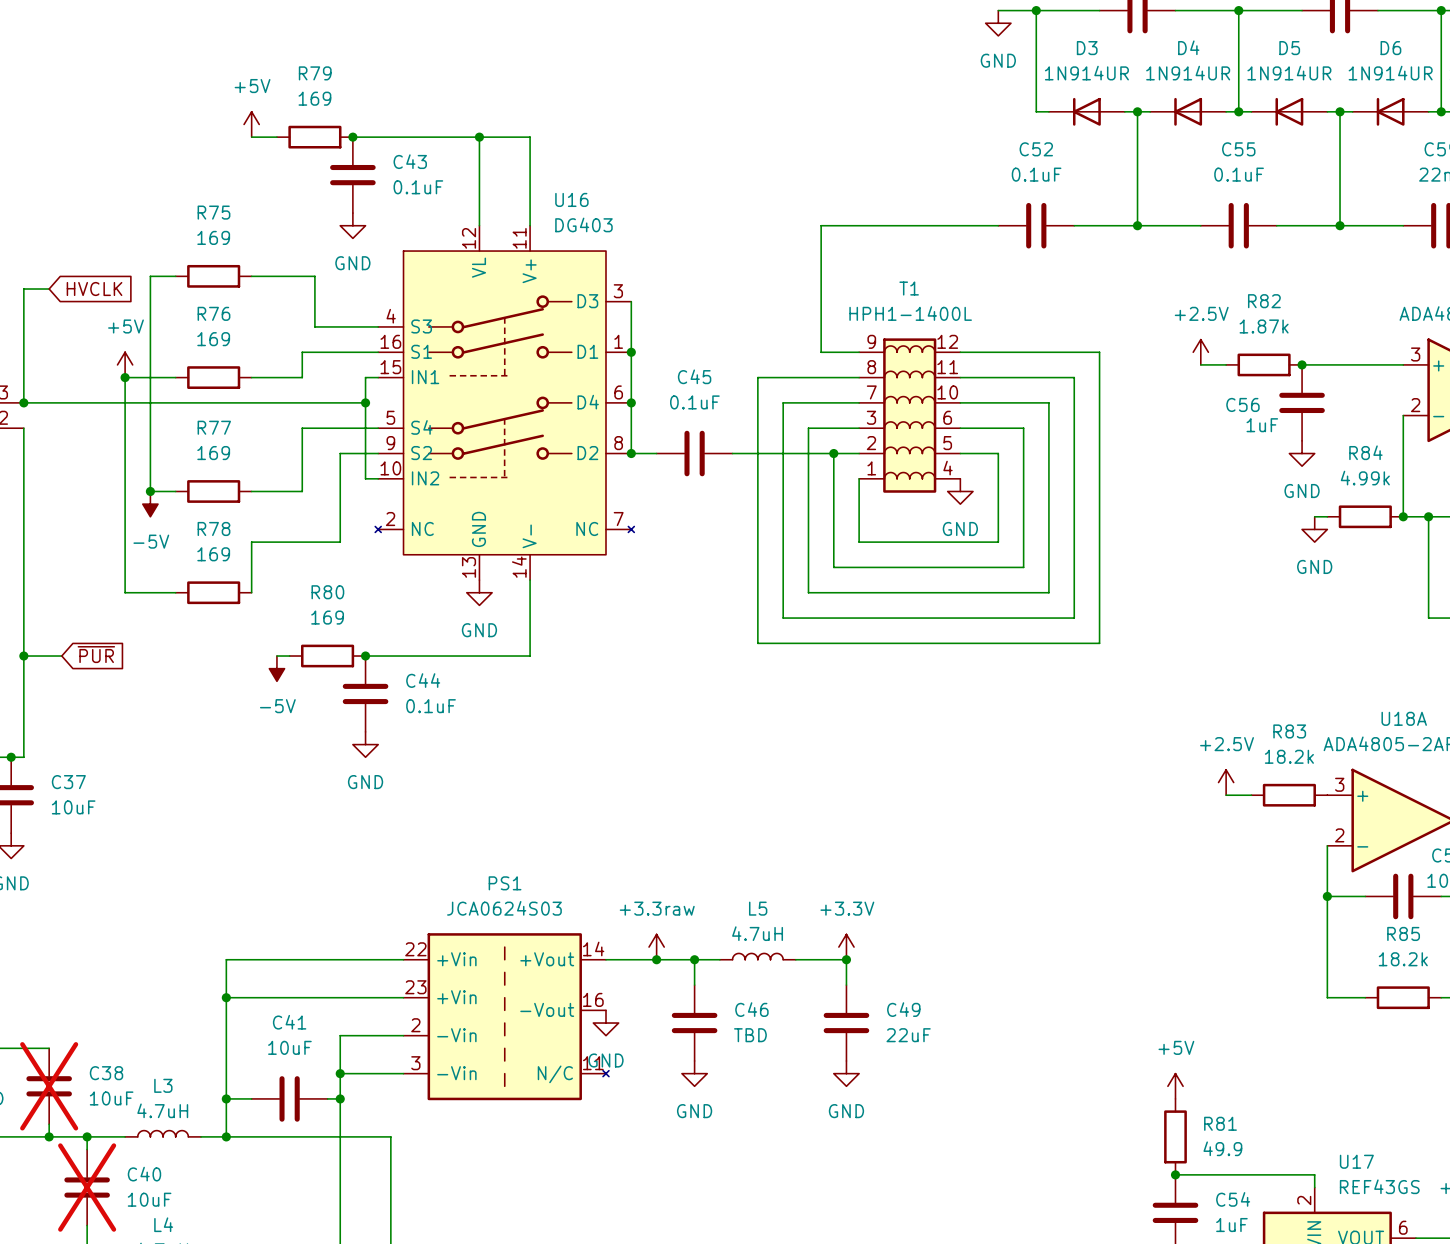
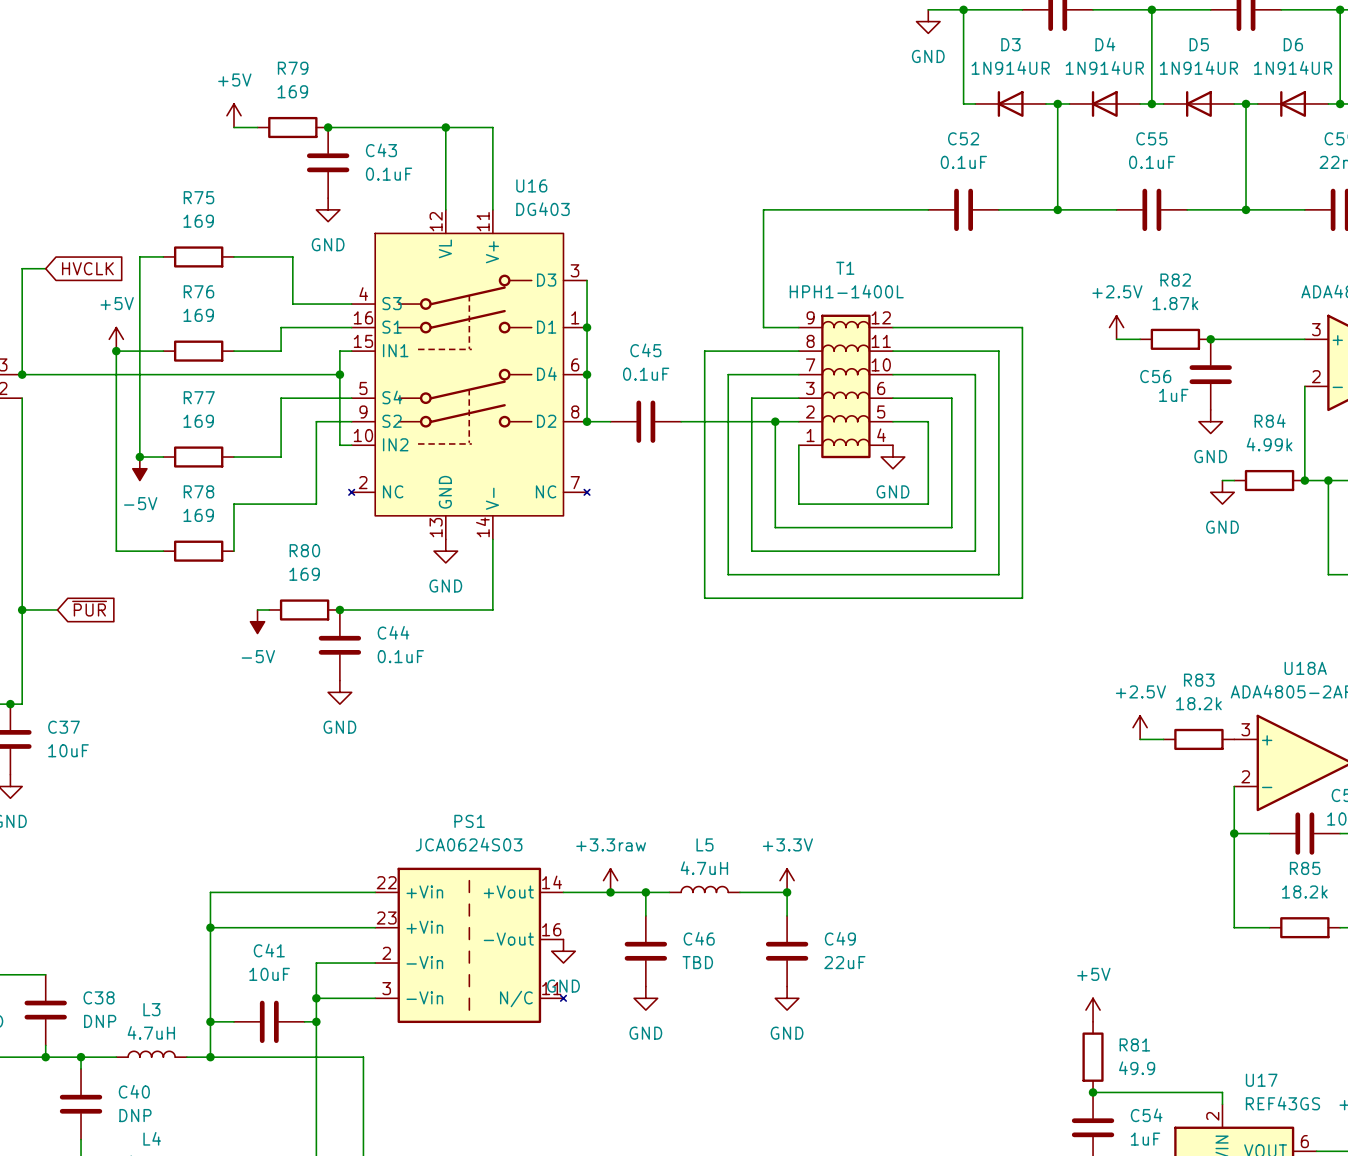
C38 do-not-place cross: (49, 1086) -> none
C38 value: 10uF (111, 1098) -> DNP (100, 1021)
C40 do-not-place cross: (87, 1187) -> none
C40 value: 10uF (149, 1199) -> DNP (135, 1115)

